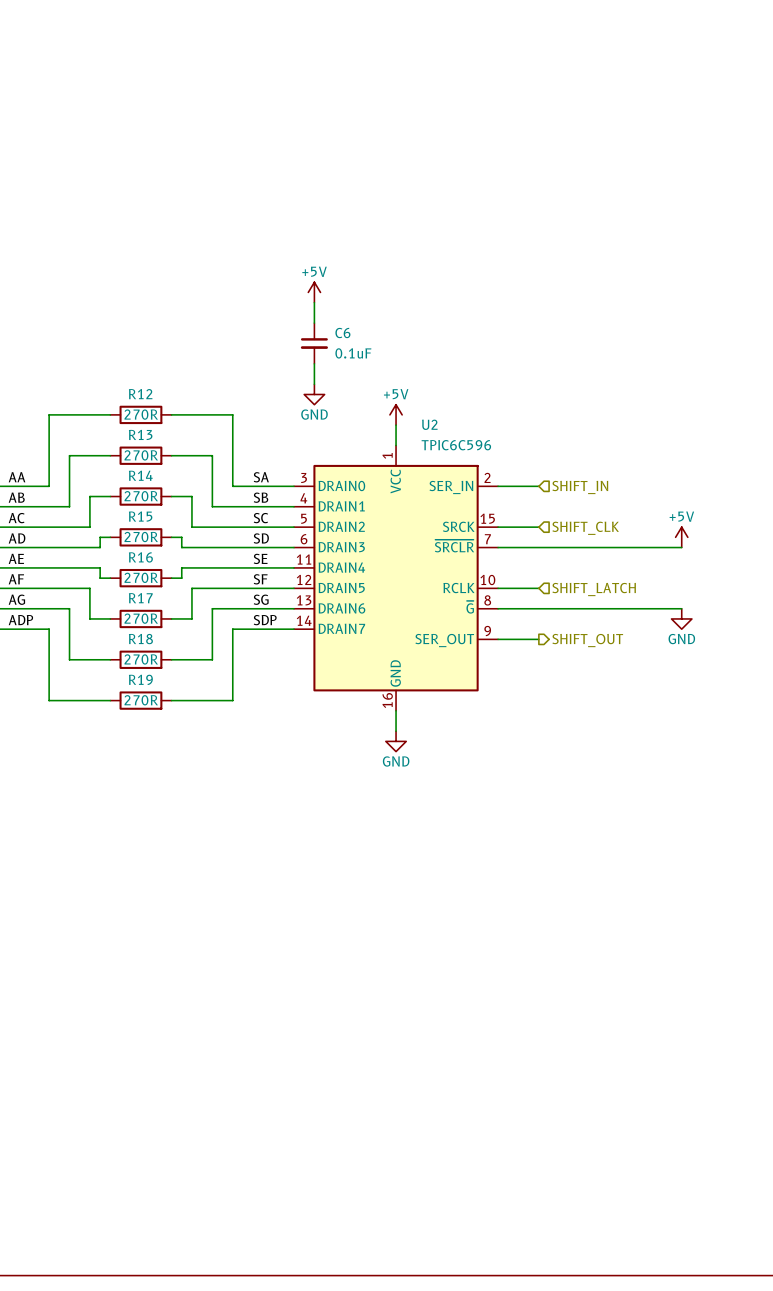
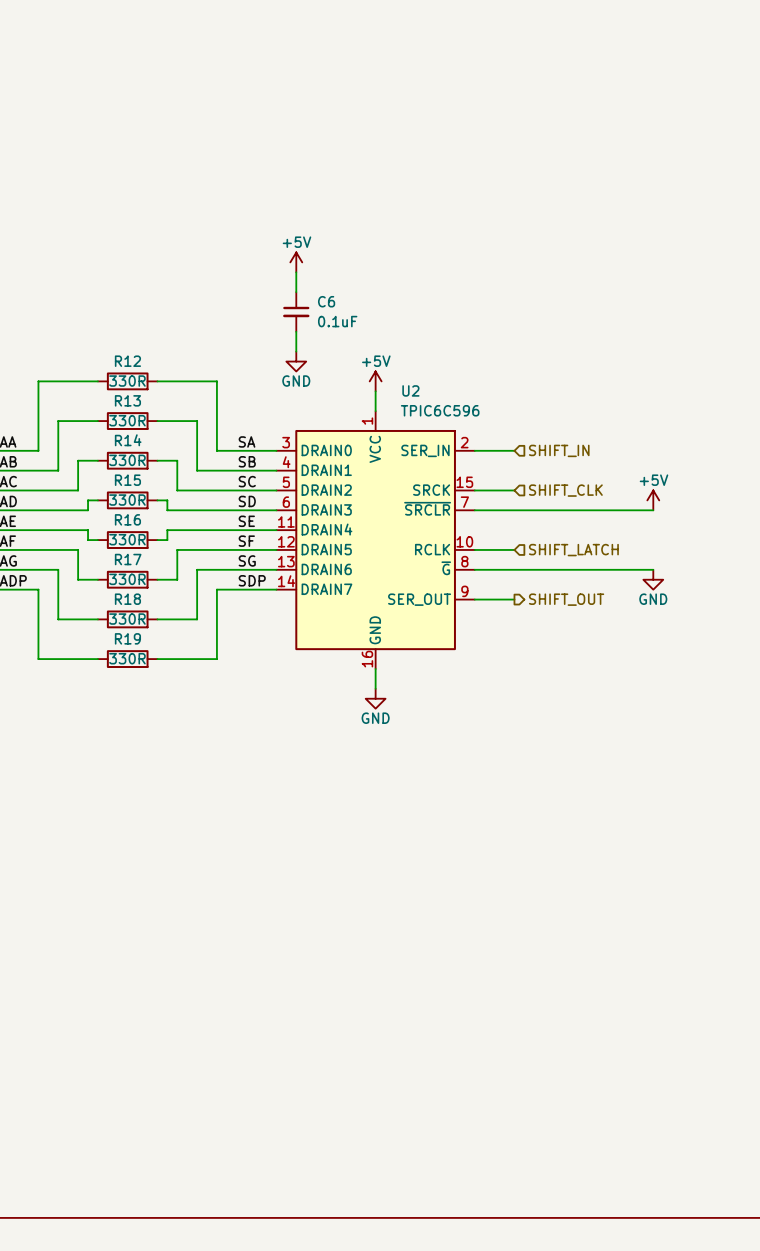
R12 value: 270R (141, 414) -> 330R (127, 381)
R13 value: 270R (141, 455) -> 330R (127, 420)
R14 value: 270R (141, 496) -> 330R (127, 460)
R15 value: 270R (141, 537) -> 330R (127, 500)
R16 value: 270R (141, 577) -> 330R (127, 539)
R17 value: 270R (141, 618) -> 330R (127, 579)
R18 value: 270R (141, 659) -> 330R (127, 619)
R19 value: 270R (141, 700) -> 330R (127, 658)

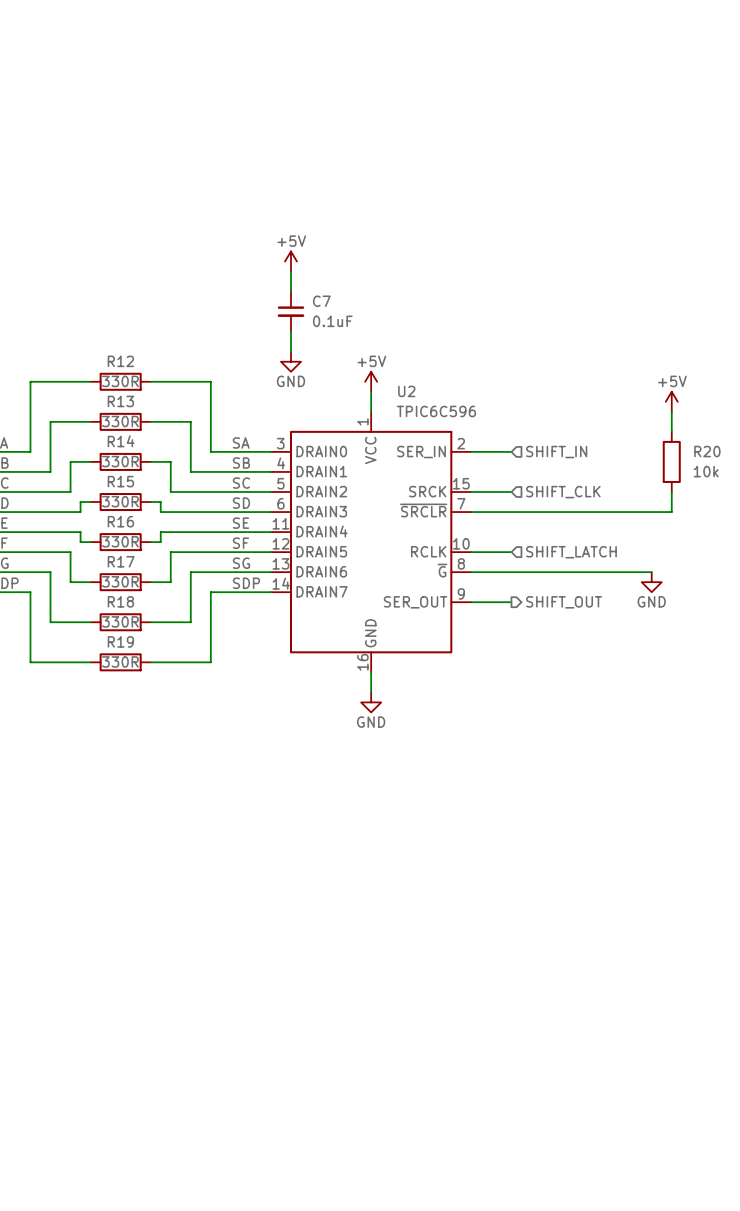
C6 name: C6 (326, 301) -> C7 (321, 301)
wire: none -> (671, 411) (671, 431)
R20: none -> 10k (671, 461)
wire: none -> (671, 492) (671, 512) (651, 512)
power symbol position: +5V (653, 500) -> +5V (671, 401)

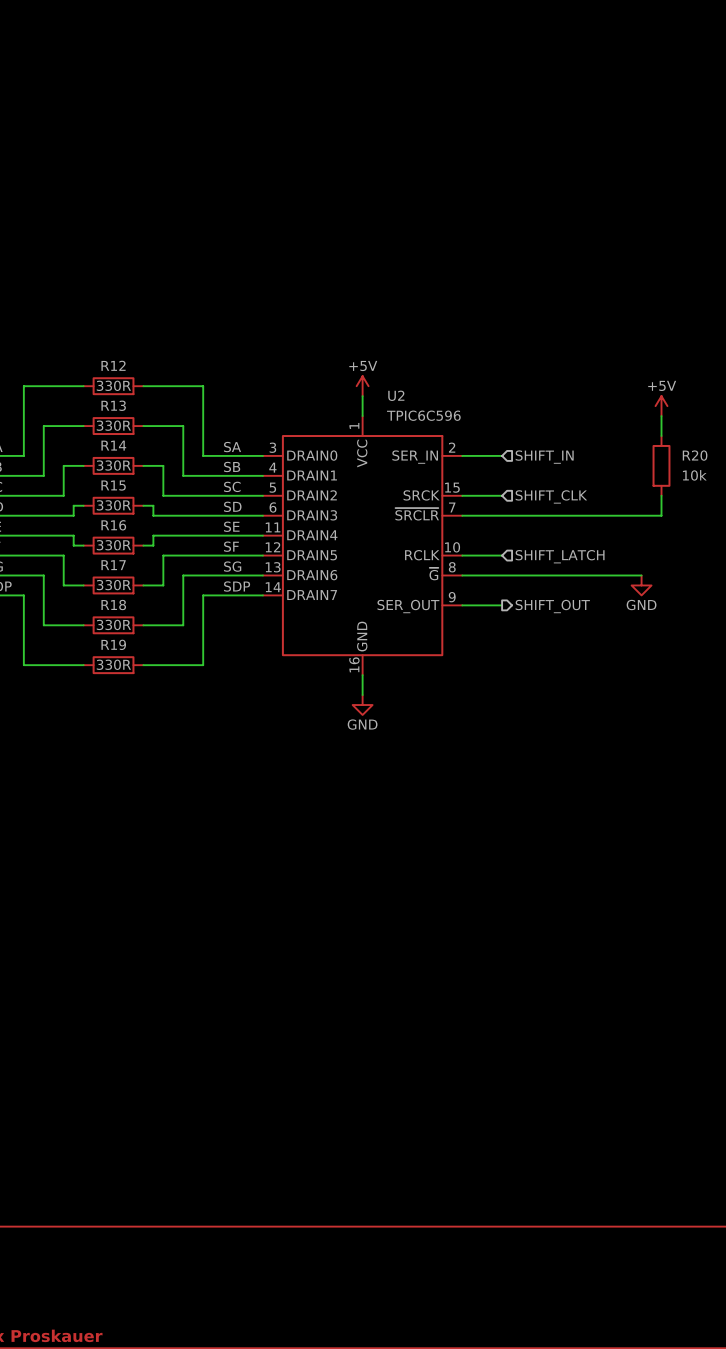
power symbol: +5V (290, 261) -> none
wire: (290, 271) (290, 291) -> none
C7: 0.1uF (290, 311) -> none
wire: (290, 331) (290, 351) -> none
power symbol: GND (290, 361) -> none

